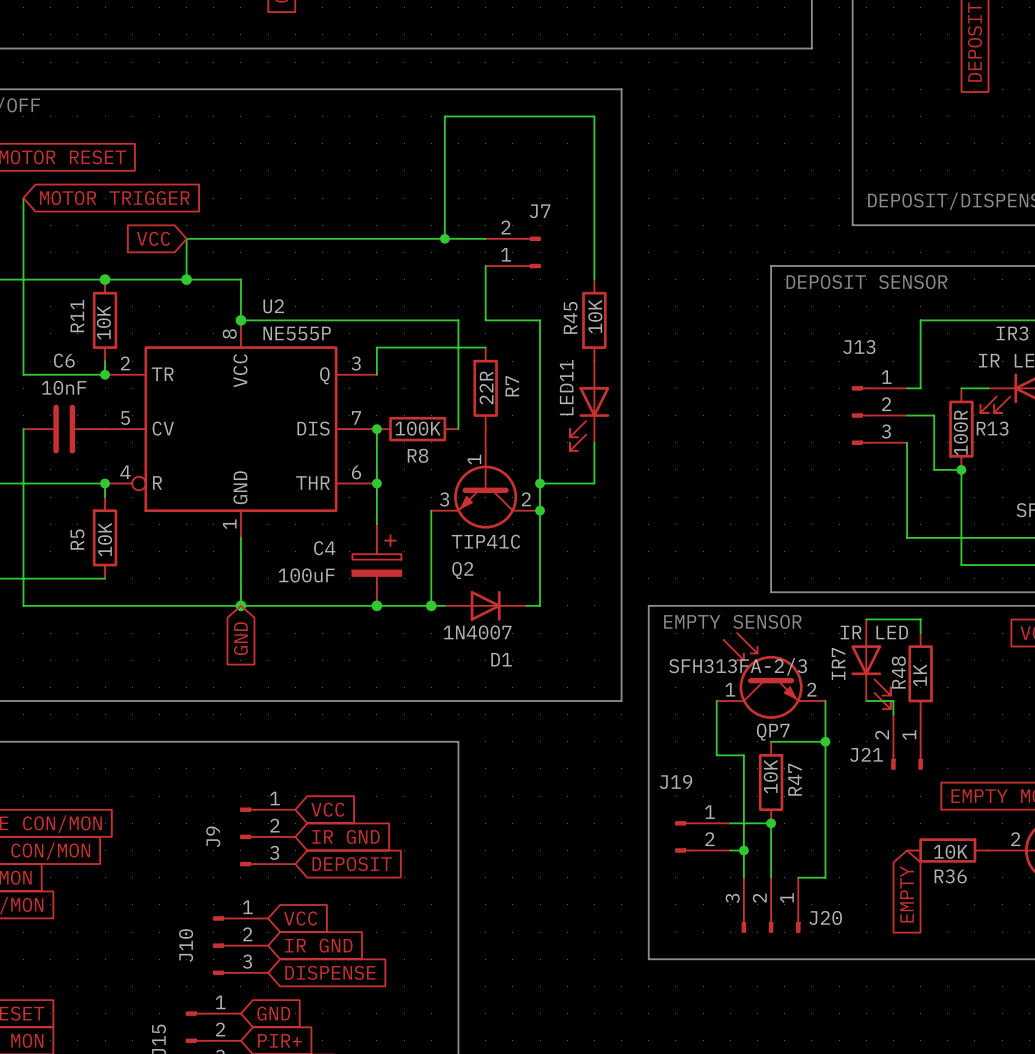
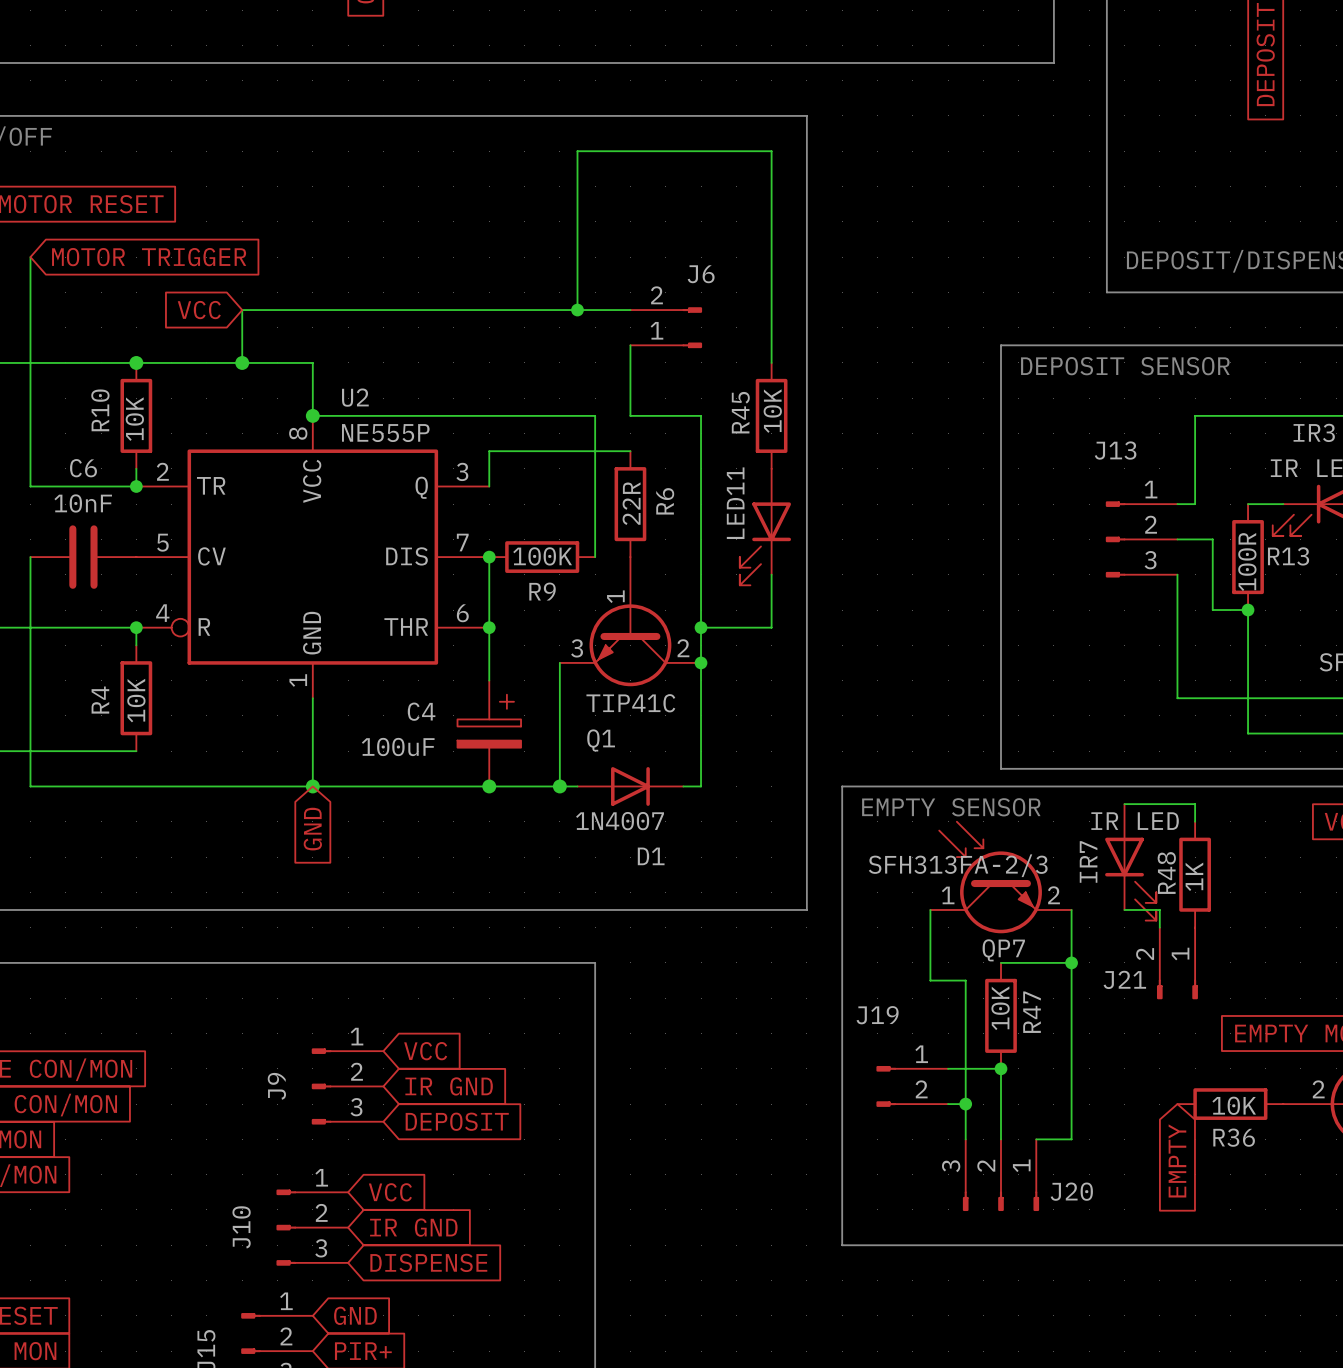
J7 name: J7 (540, 211) -> J6 (701, 274)
R11 name: R11 (77, 316) -> R10 (100, 410)
R7 name: R7 (512, 386) -> R6 (665, 501)
R8 name: R8 (418, 455) -> R9 (542, 591)
R5 name: R5 (77, 539) -> R4 (100, 700)
Q2 name: Q2 (462, 570) -> Q1 (601, 740)

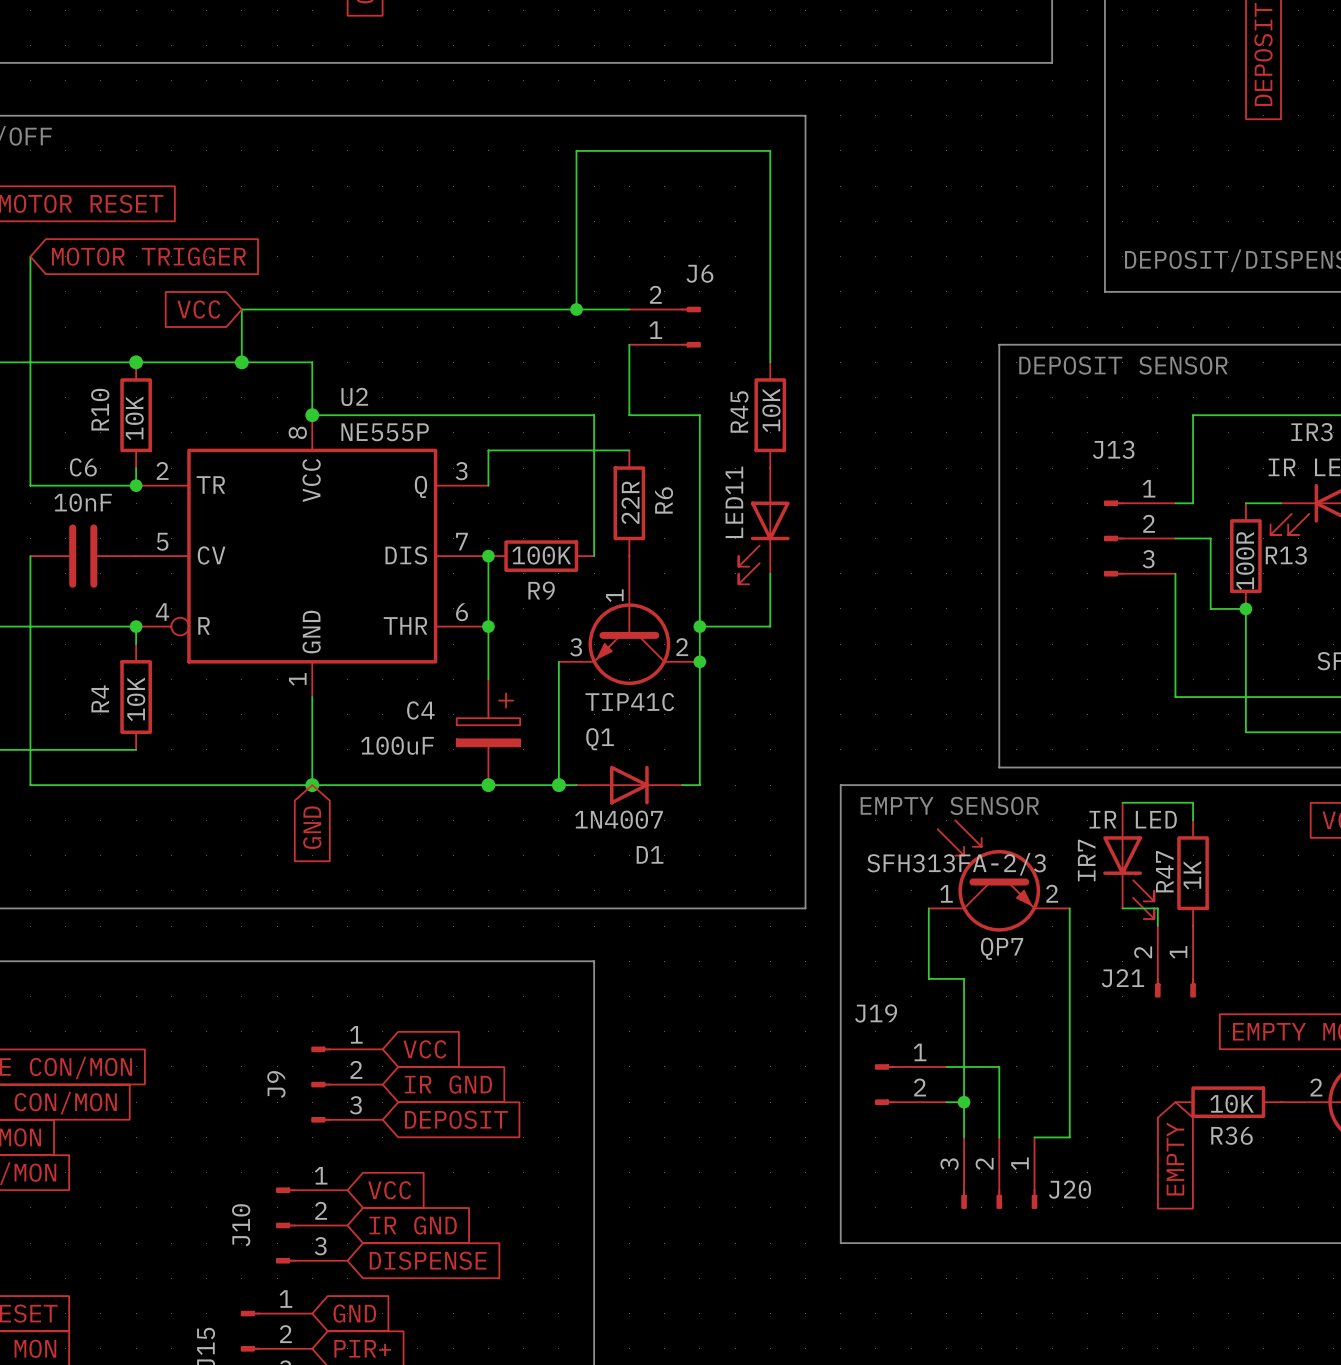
R48 name: R48 (1166, 873) -> R47 (1164, 871)
wire: (1001, 962) (1071, 962) -> none
junction: (1071, 962) -> none
R47: 10K (1001, 1015) -> none
junction: (1001, 1068) -> none

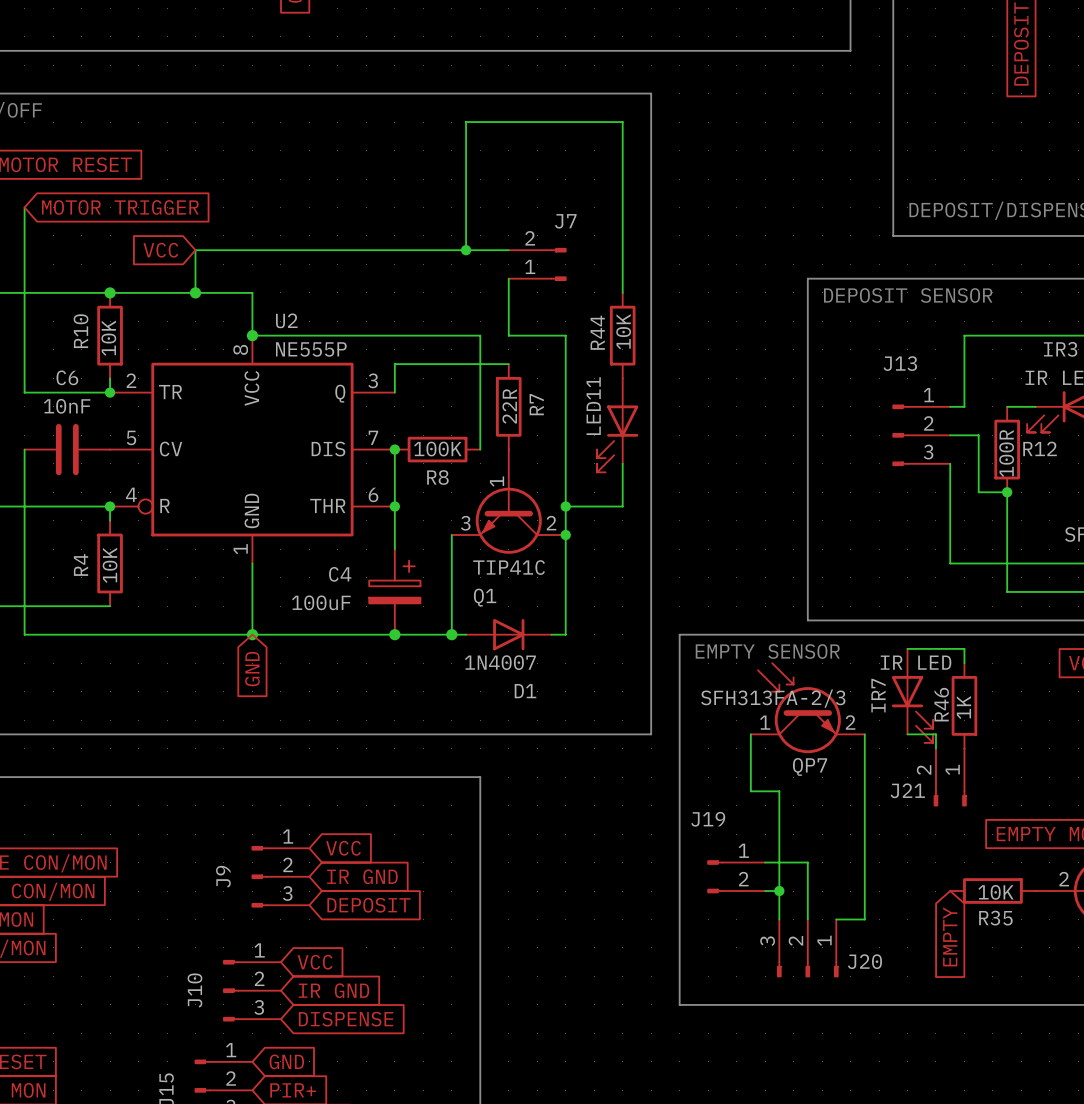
J6 name: J6 (699, 273) -> J7 (565, 221)
R45 name: R45 (739, 411) -> R44 (597, 332)
R6 name: R6 (664, 500) -> R7 (536, 404)
R13 name: R13 (1286, 555) -> R12 (1040, 448)
R9 name: R9 (541, 590) -> R8 (437, 477)
R47 name: R47 (1164, 871) -> R46 (941, 704)
R36 name: R36 (1232, 1135) -> R35 (995, 918)

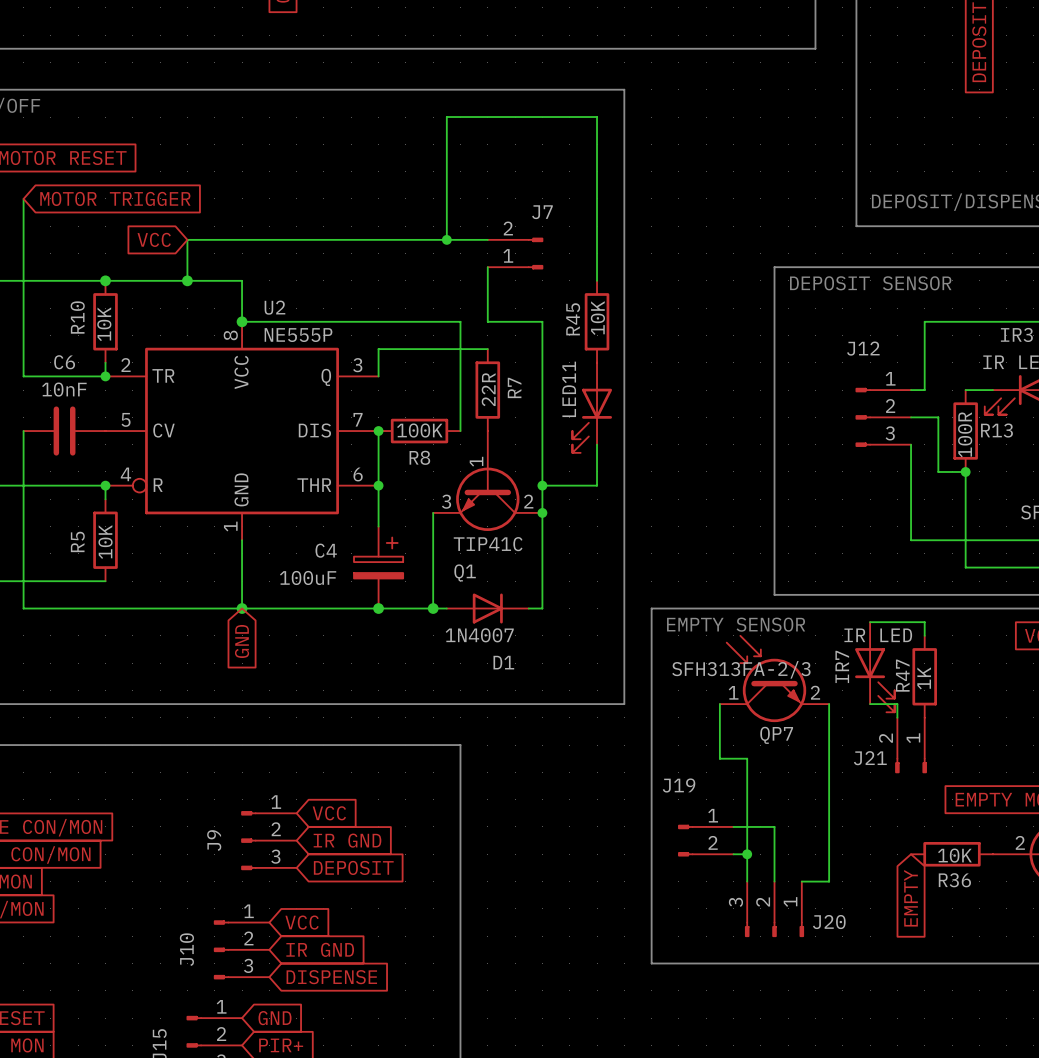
R44 name: R44 (597, 332) -> R45 (573, 319)
J13 name: J13 (900, 363) -> J12 (863, 348)
R12 name: R12 (1040, 448) -> R13 (996, 430)
R4 name: R4 (81, 564) -> R5 (77, 541)
R46 name: R46 (941, 704) -> R47 (902, 675)
R35 name: R35 (995, 918) -> R36 (954, 880)

